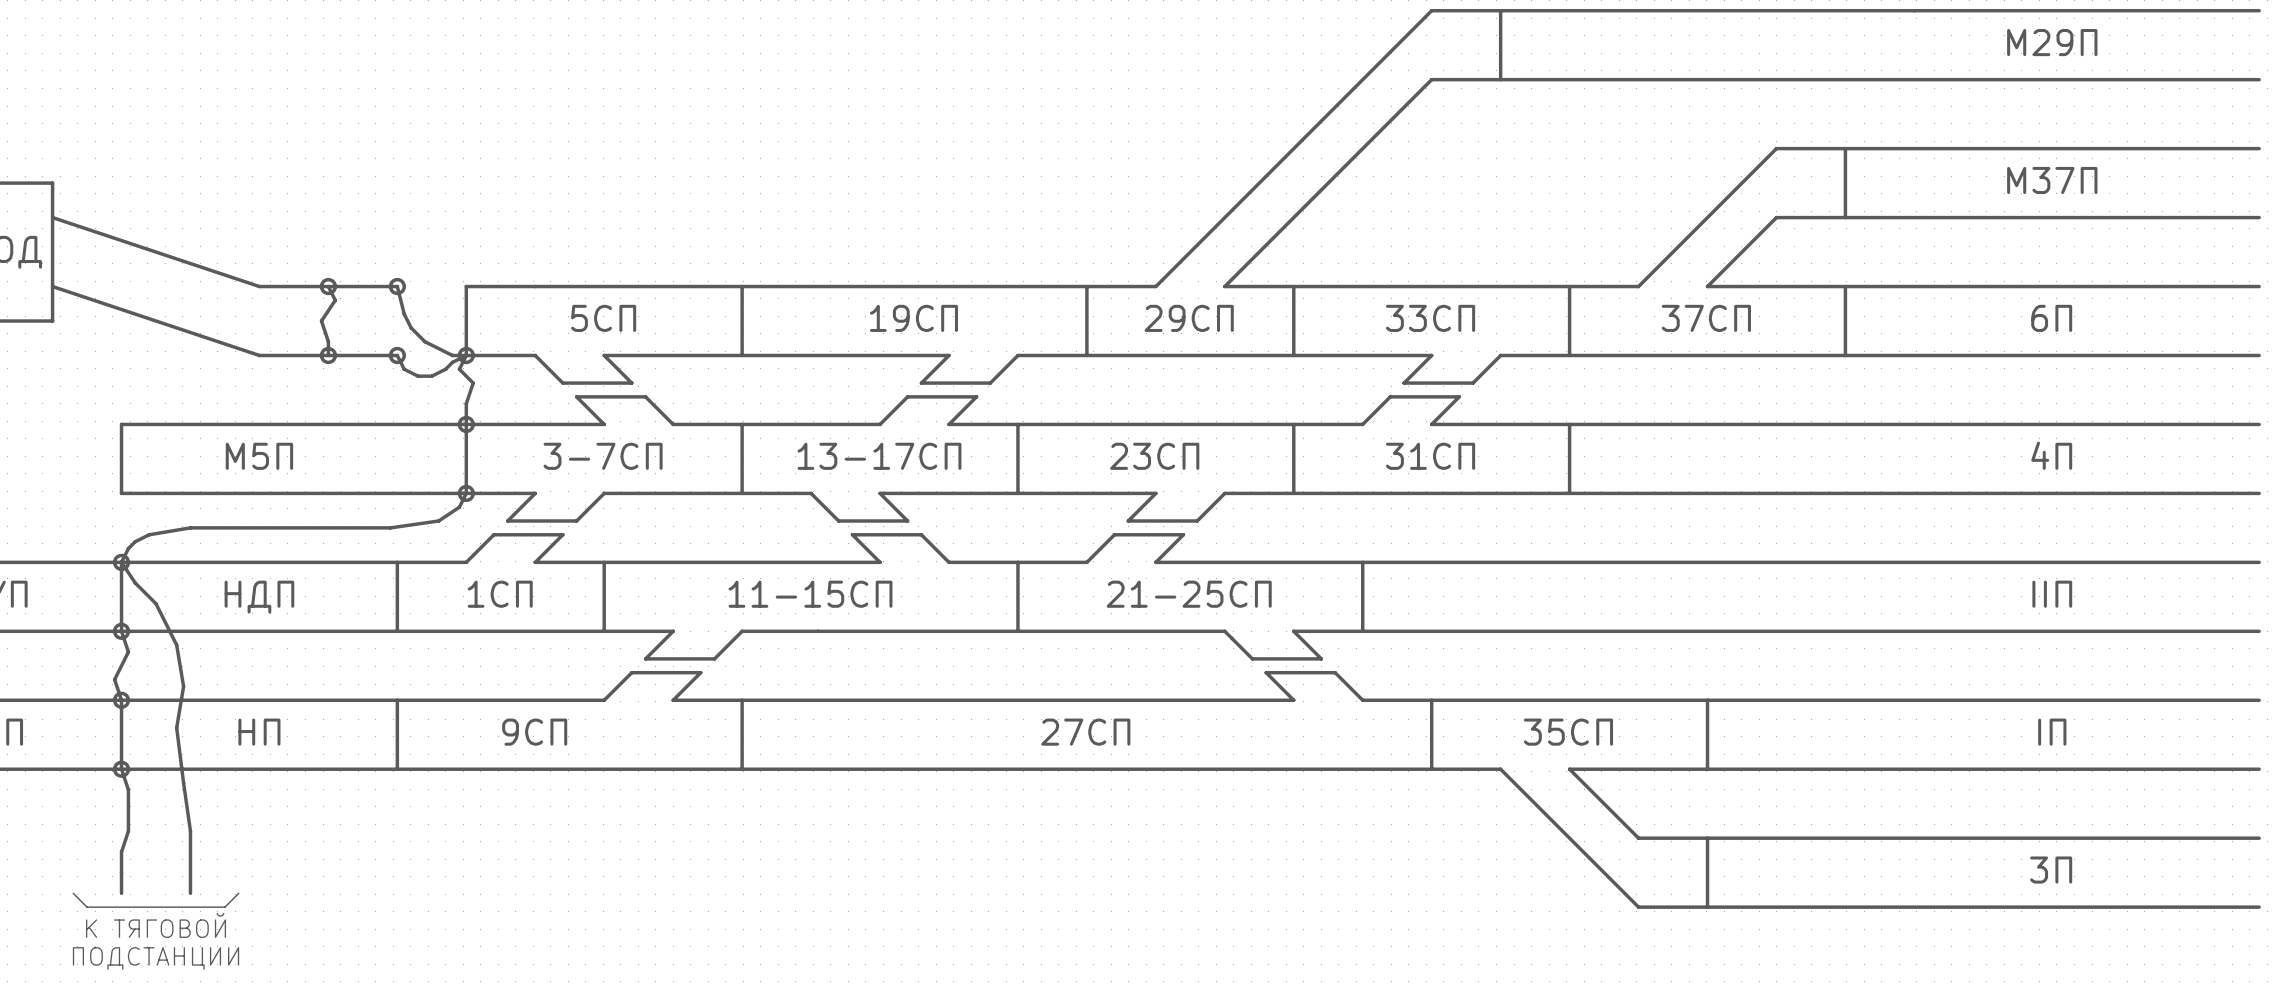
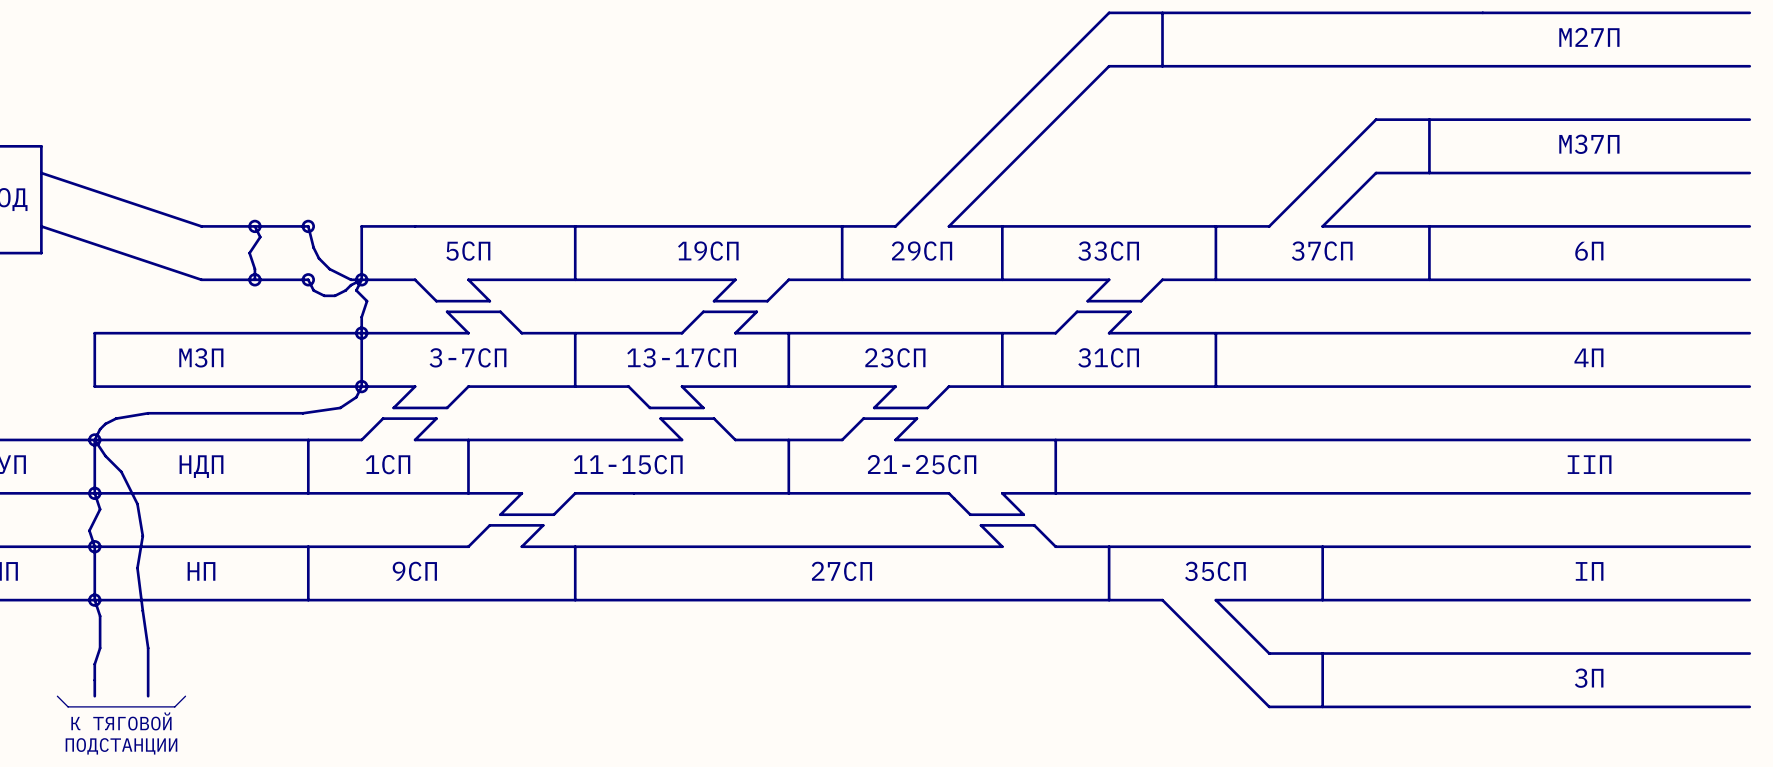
text: М29П (2052, 42) -> М27П (1589, 37)
text: М5П (259, 456) -> М3П (201, 357)

